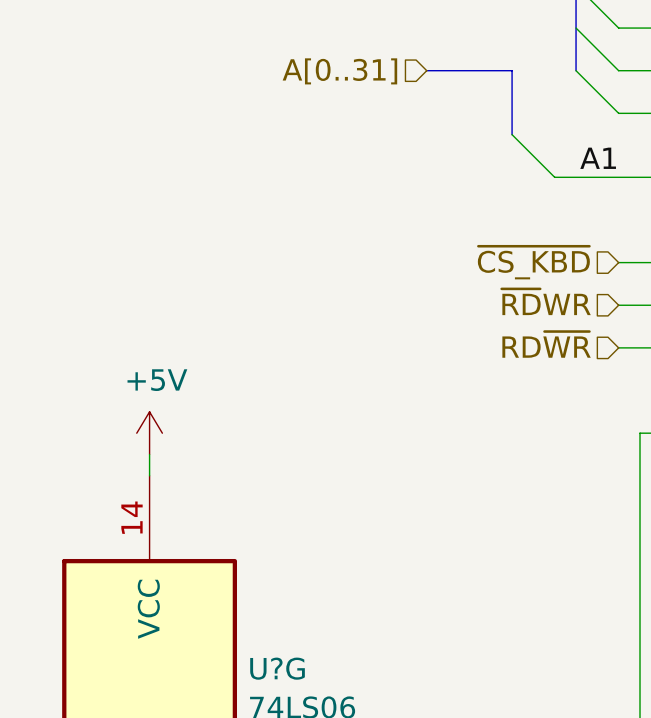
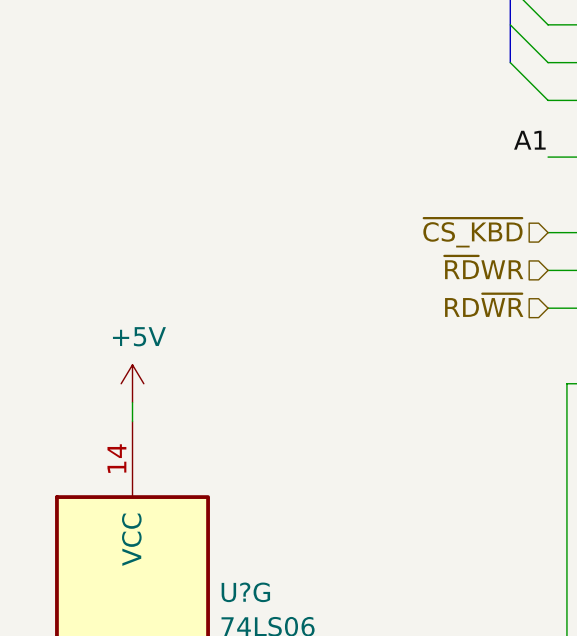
bus: (426, 70) (512, 70) (512, 134) -> none
hierarchical label: A[0..31] (339, 71) -> none
wire: (512, 134) (554, 177) (618, 177) -> none

